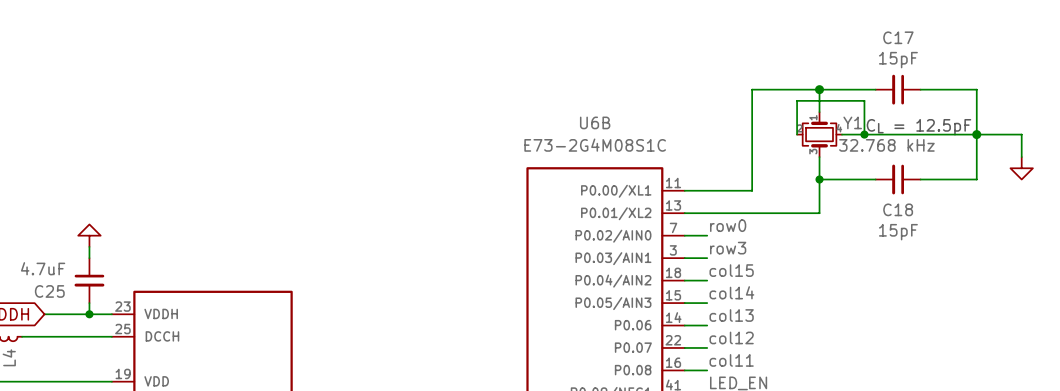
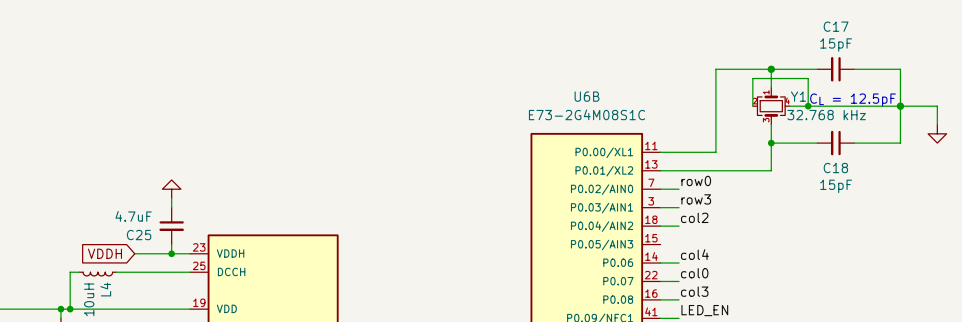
label: col15 (731, 270) -> col2 (694, 217)
label: col14 (731, 292) -> none
wire: (684, 303) (707, 303) -> none
label: col13 (731, 315) -> col4 (694, 254)
label: col12 (731, 337) -> col0 (694, 273)
label: col11 (731, 360) -> col3 (694, 291)

